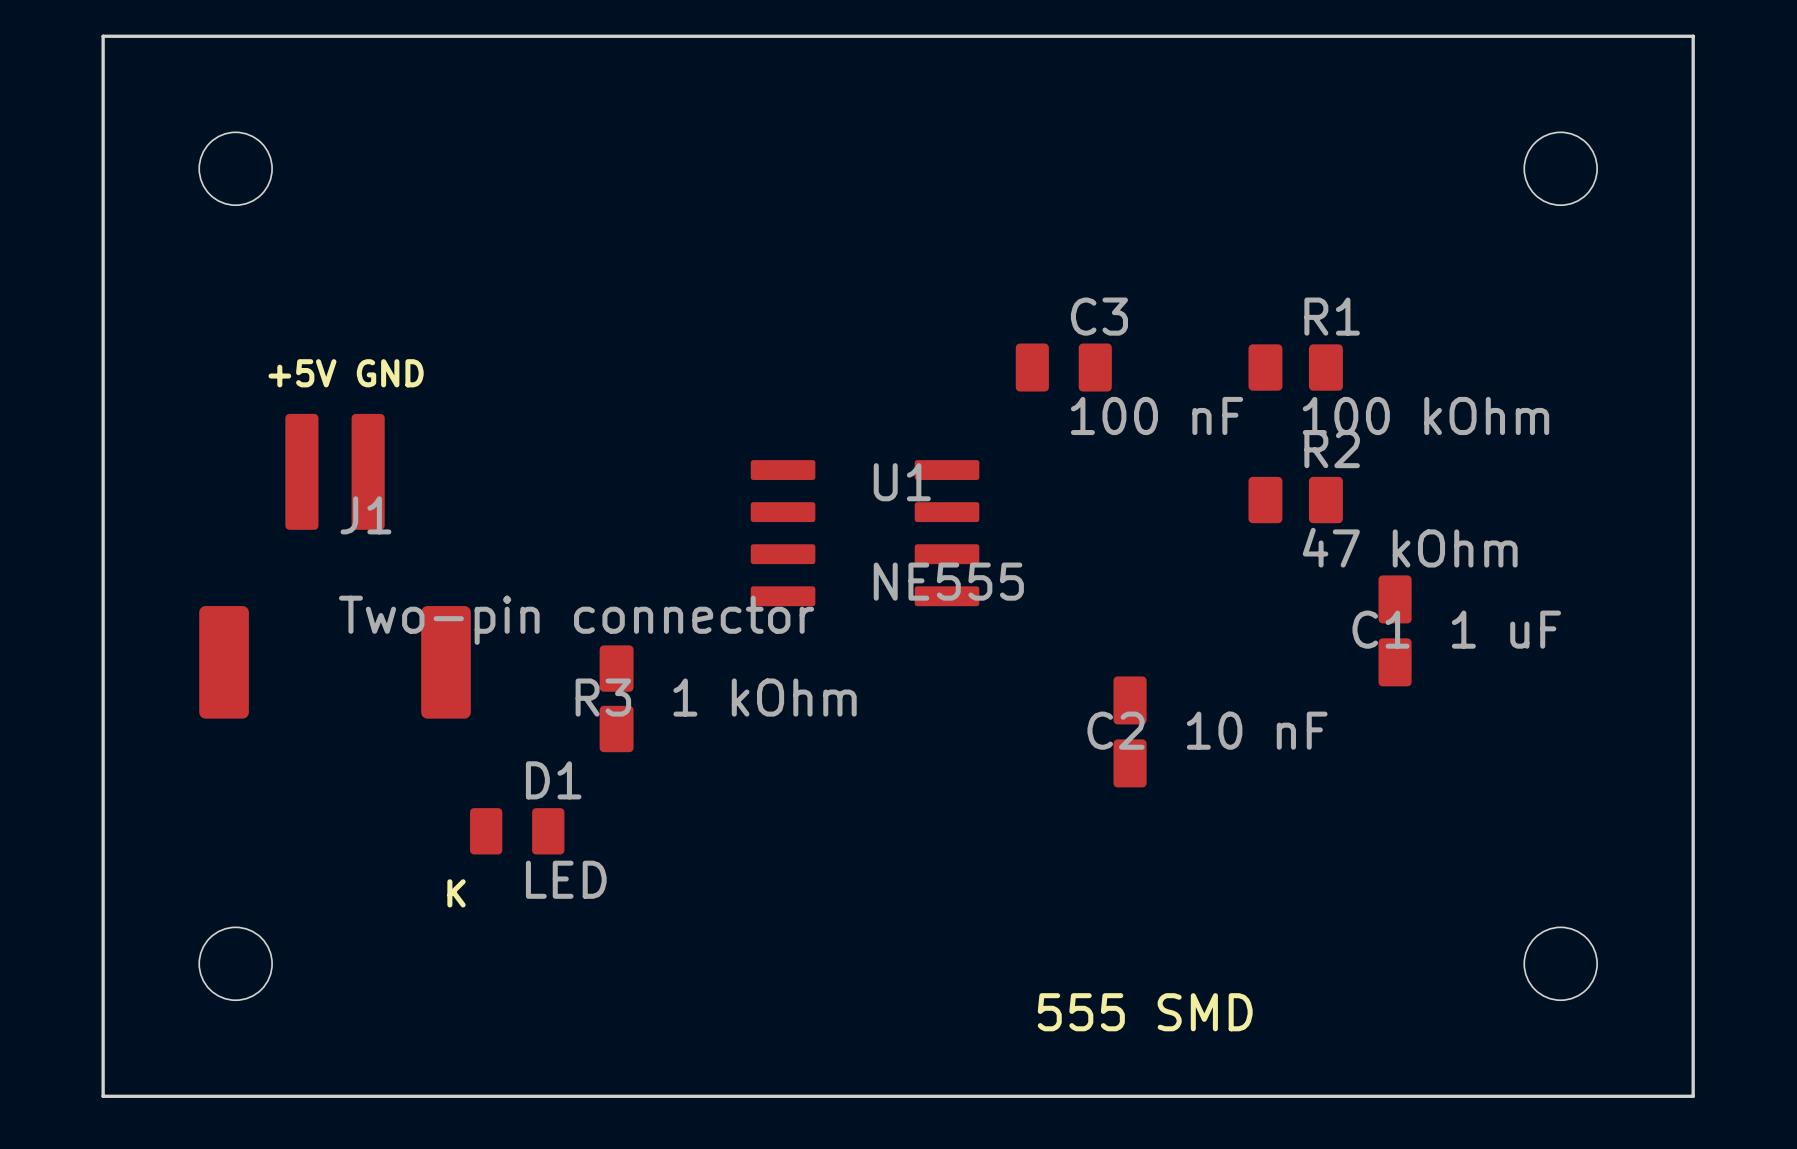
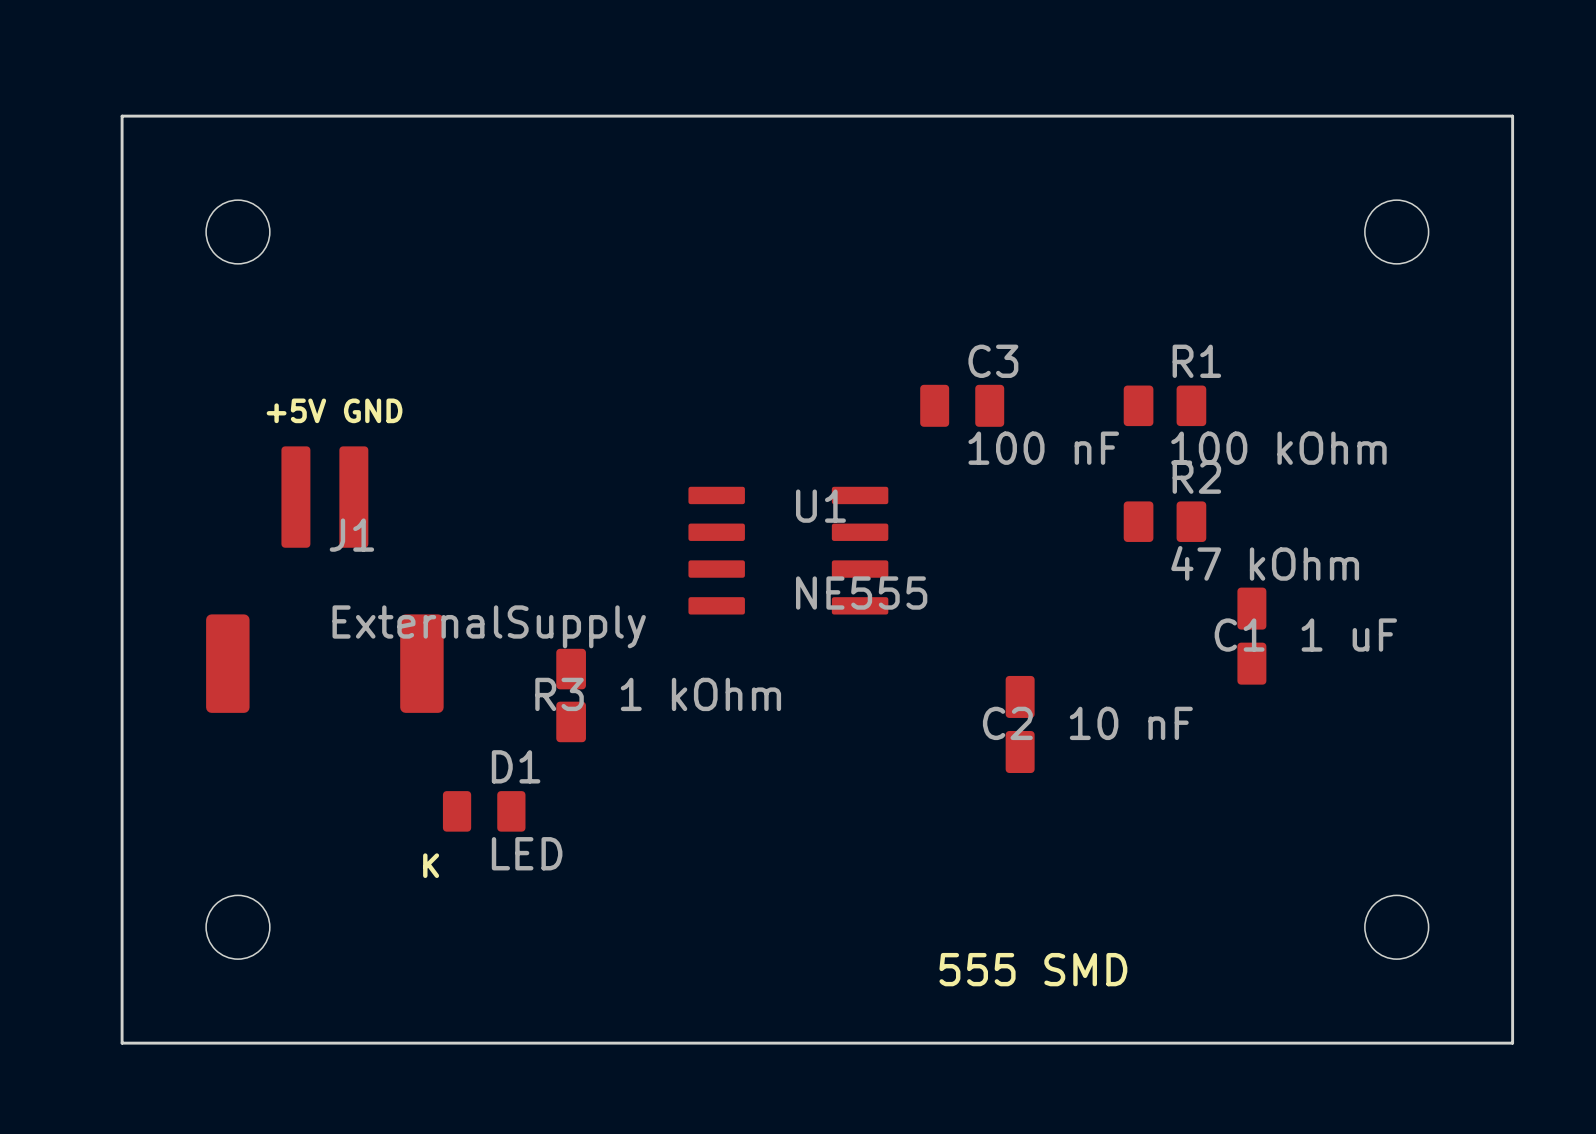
J1 value: Two-pin connector (576, 620) -> ExternalSupply (489, 626)

